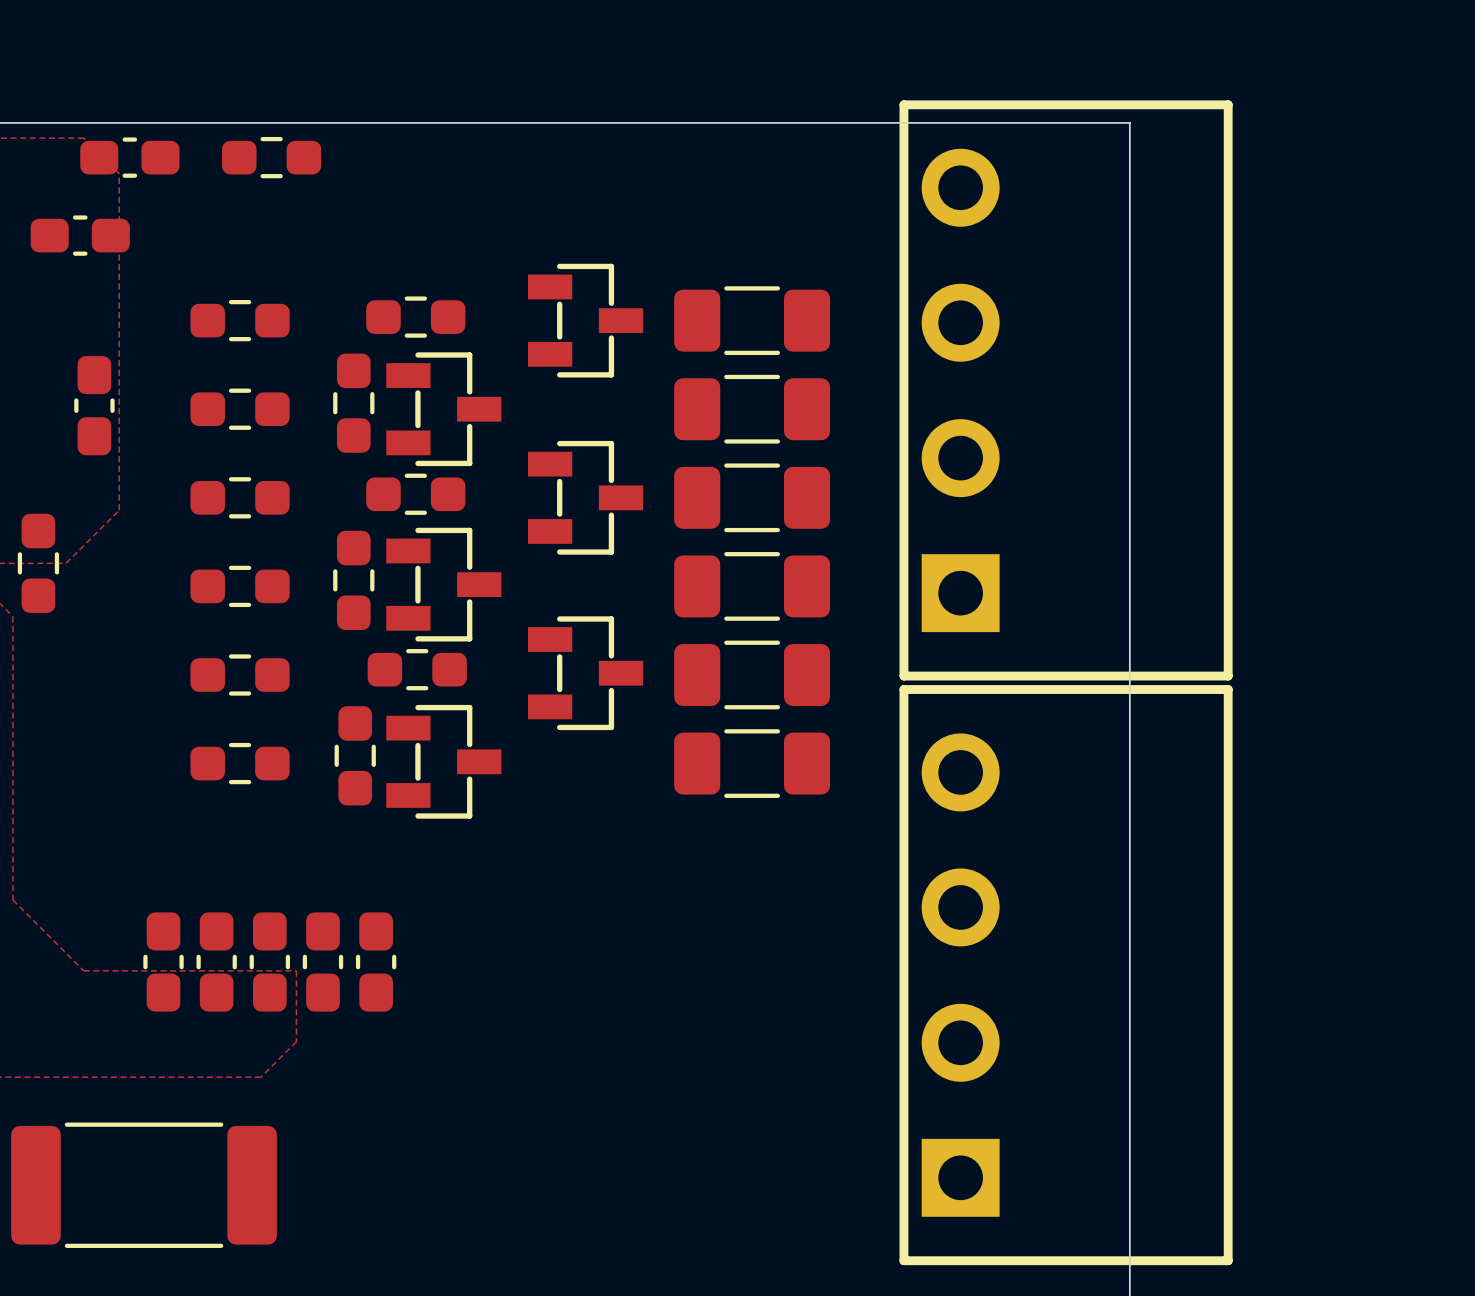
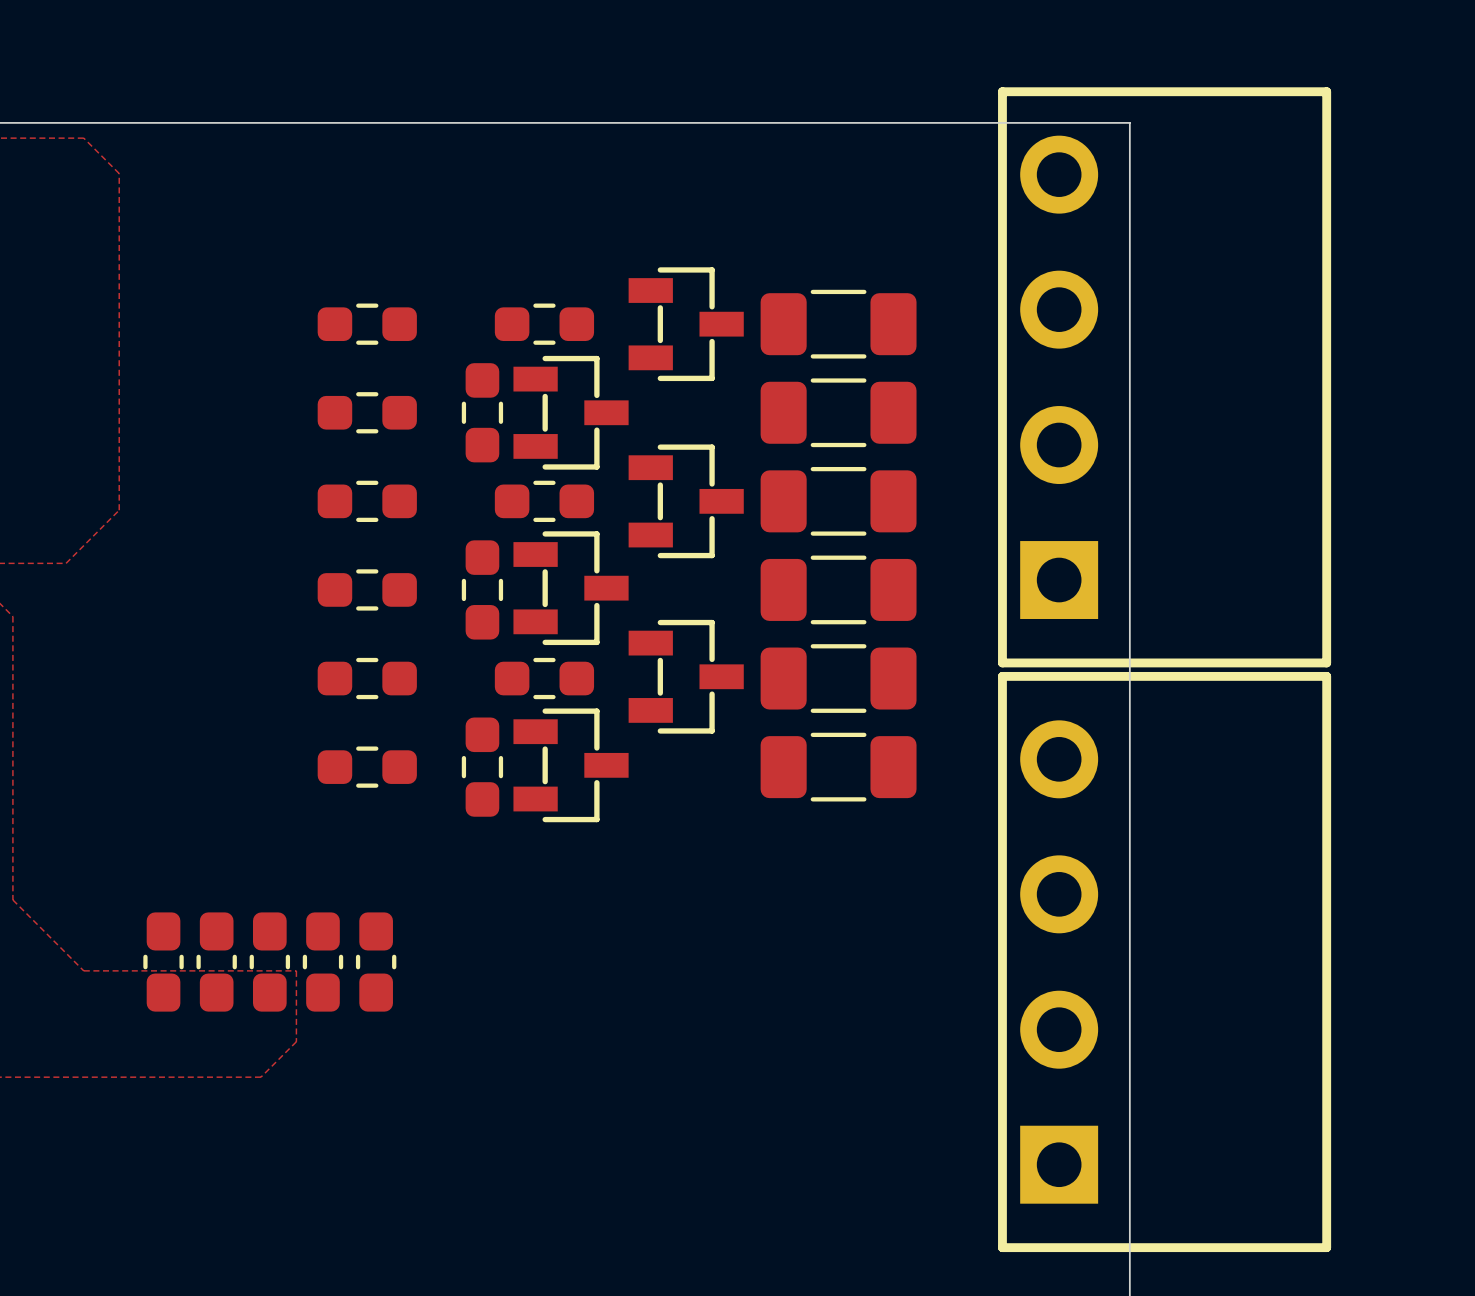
part: (129, 157) -> none
part: (271, 157) -> none
part: (80, 235) -> none
part position: (415, 317) -> (367, 324)
part: (240, 320) -> none
part: (585, 320) -> none
part: (752, 320) -> none
part: none -> (544, 324)
part: none -> (686, 324)
part: none -> (838, 324)
part position: (1066, 390) -> (1164, 377)
part rotation: 0° (353, 403) -> 90° clockwise (367, 412)
part: (94, 405) -> none
part: (240, 409) -> none
part: (443, 409) -> none
part: (752, 409) -> none
part: none -> (482, 412)
part: none -> (571, 412)
part: none -> (838, 412)
part position: (415, 494) -> (367, 501)
part: (240, 497) -> none
part: (585, 497) -> none
part: (752, 497) -> none
part: none -> (544, 501)
part: none -> (686, 501)
part: none -> (838, 501)
part: (38, 563) -> none
part rotation: 0° (353, 580) -> 90° clockwise (367, 589)
part: (443, 584) -> none
part: (240, 586) -> none
part: (752, 586) -> none
part: none -> (571, 588)
part: none -> (482, 589)
part: none -> (838, 589)
part position: (417, 669) -> (367, 678)
part: (585, 673) -> none
part: (240, 674) -> none
part: (752, 674) -> none
part: none -> (686, 676)
part: none -> (544, 678)
part: none -> (838, 678)
part rotation: 0° (355, 755) -> 90° clockwise (367, 767)
part: (443, 761) -> none
part: (240, 763) -> none
part: (752, 763) -> none
part: none -> (571, 765)
part: none -> (482, 767)
part: none -> (838, 767)
part position: (1066, 975) -> (1164, 962)
part: (144, 1185) -> none

